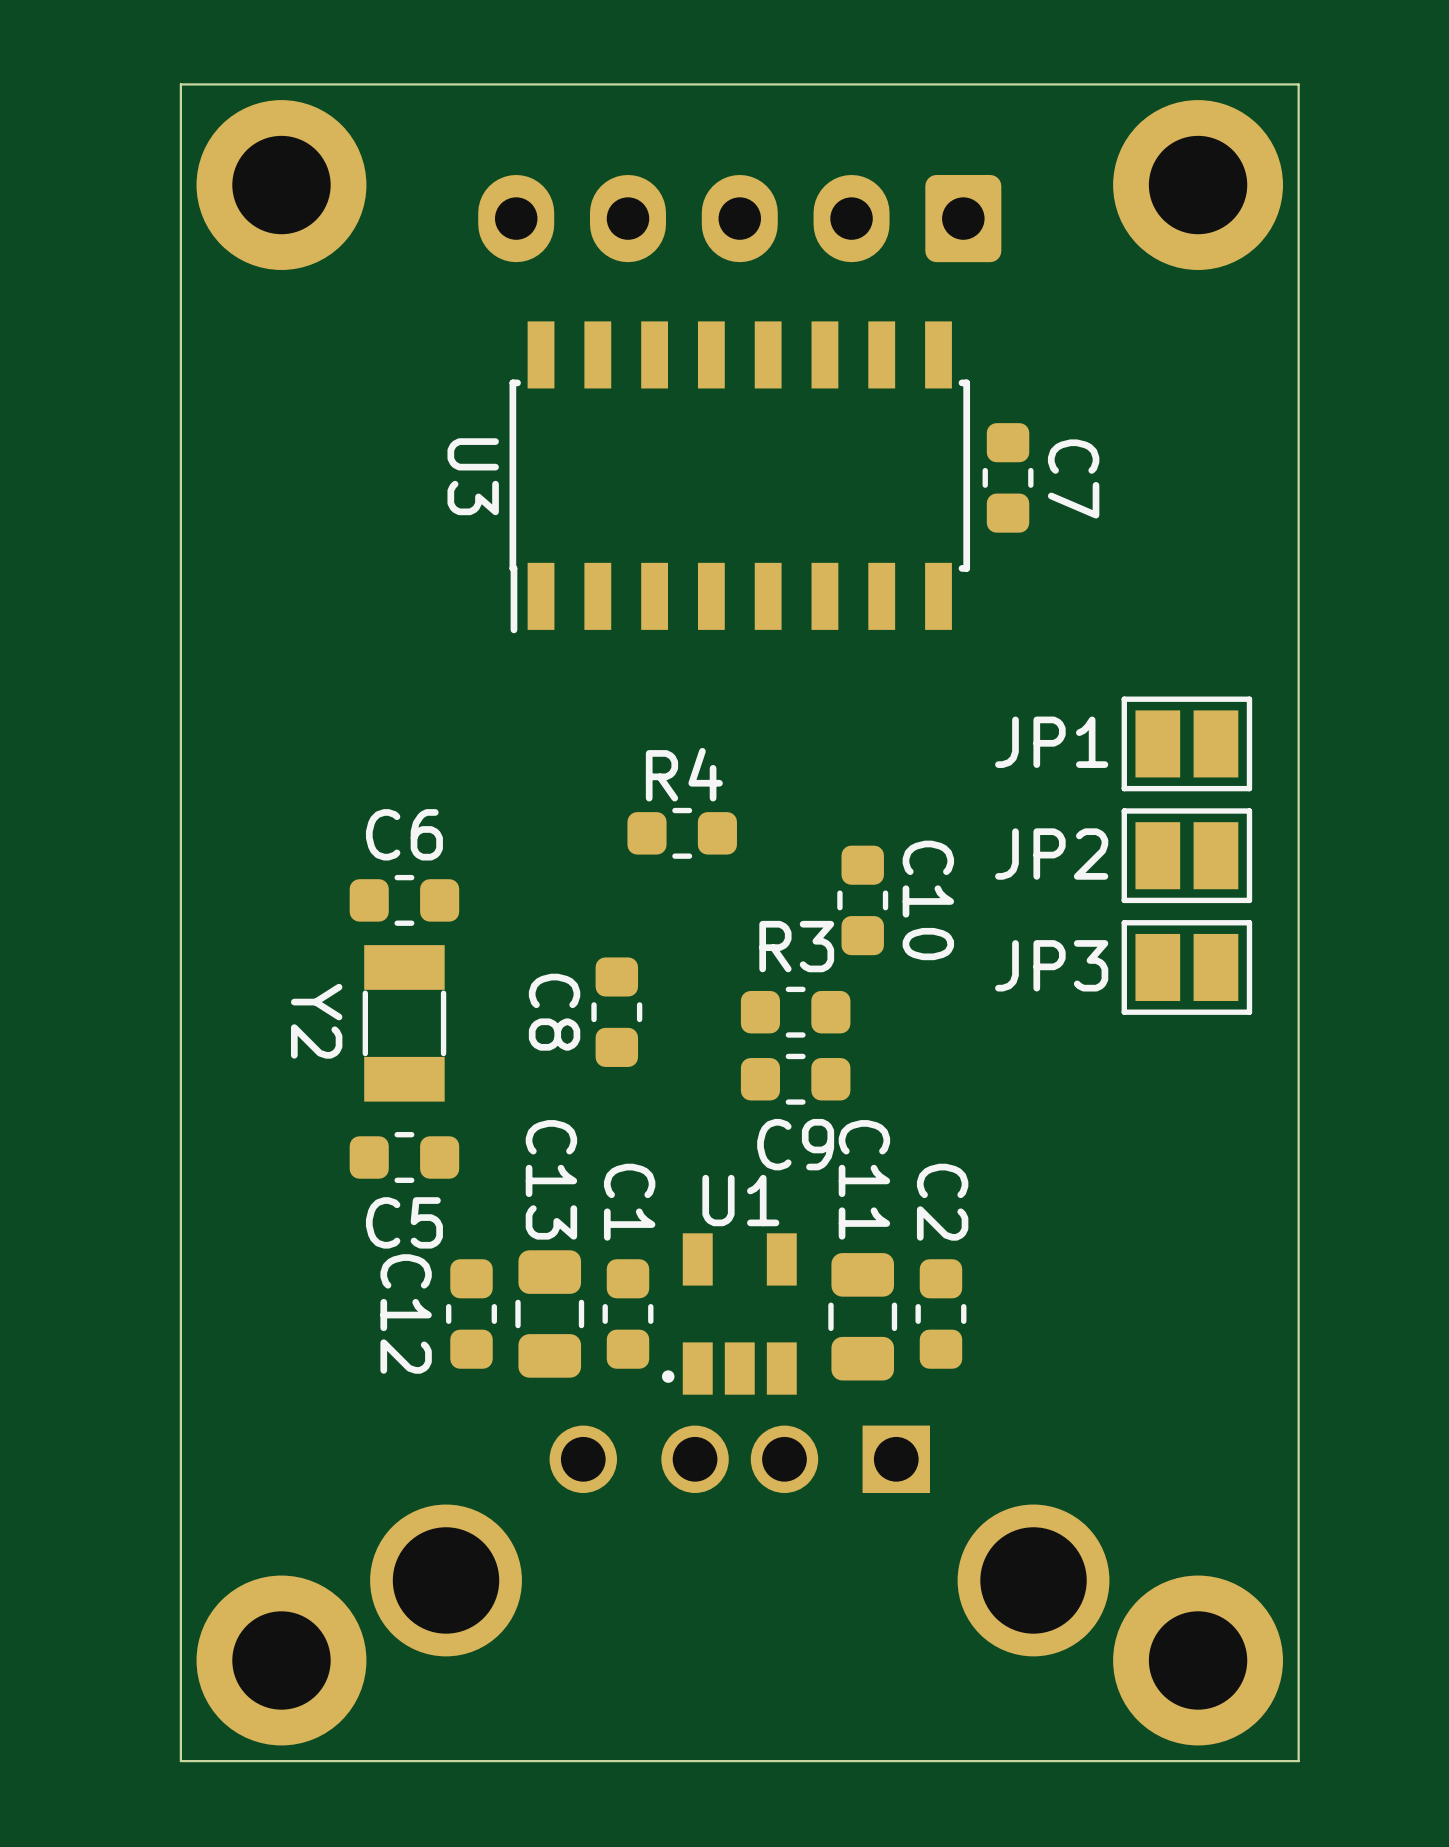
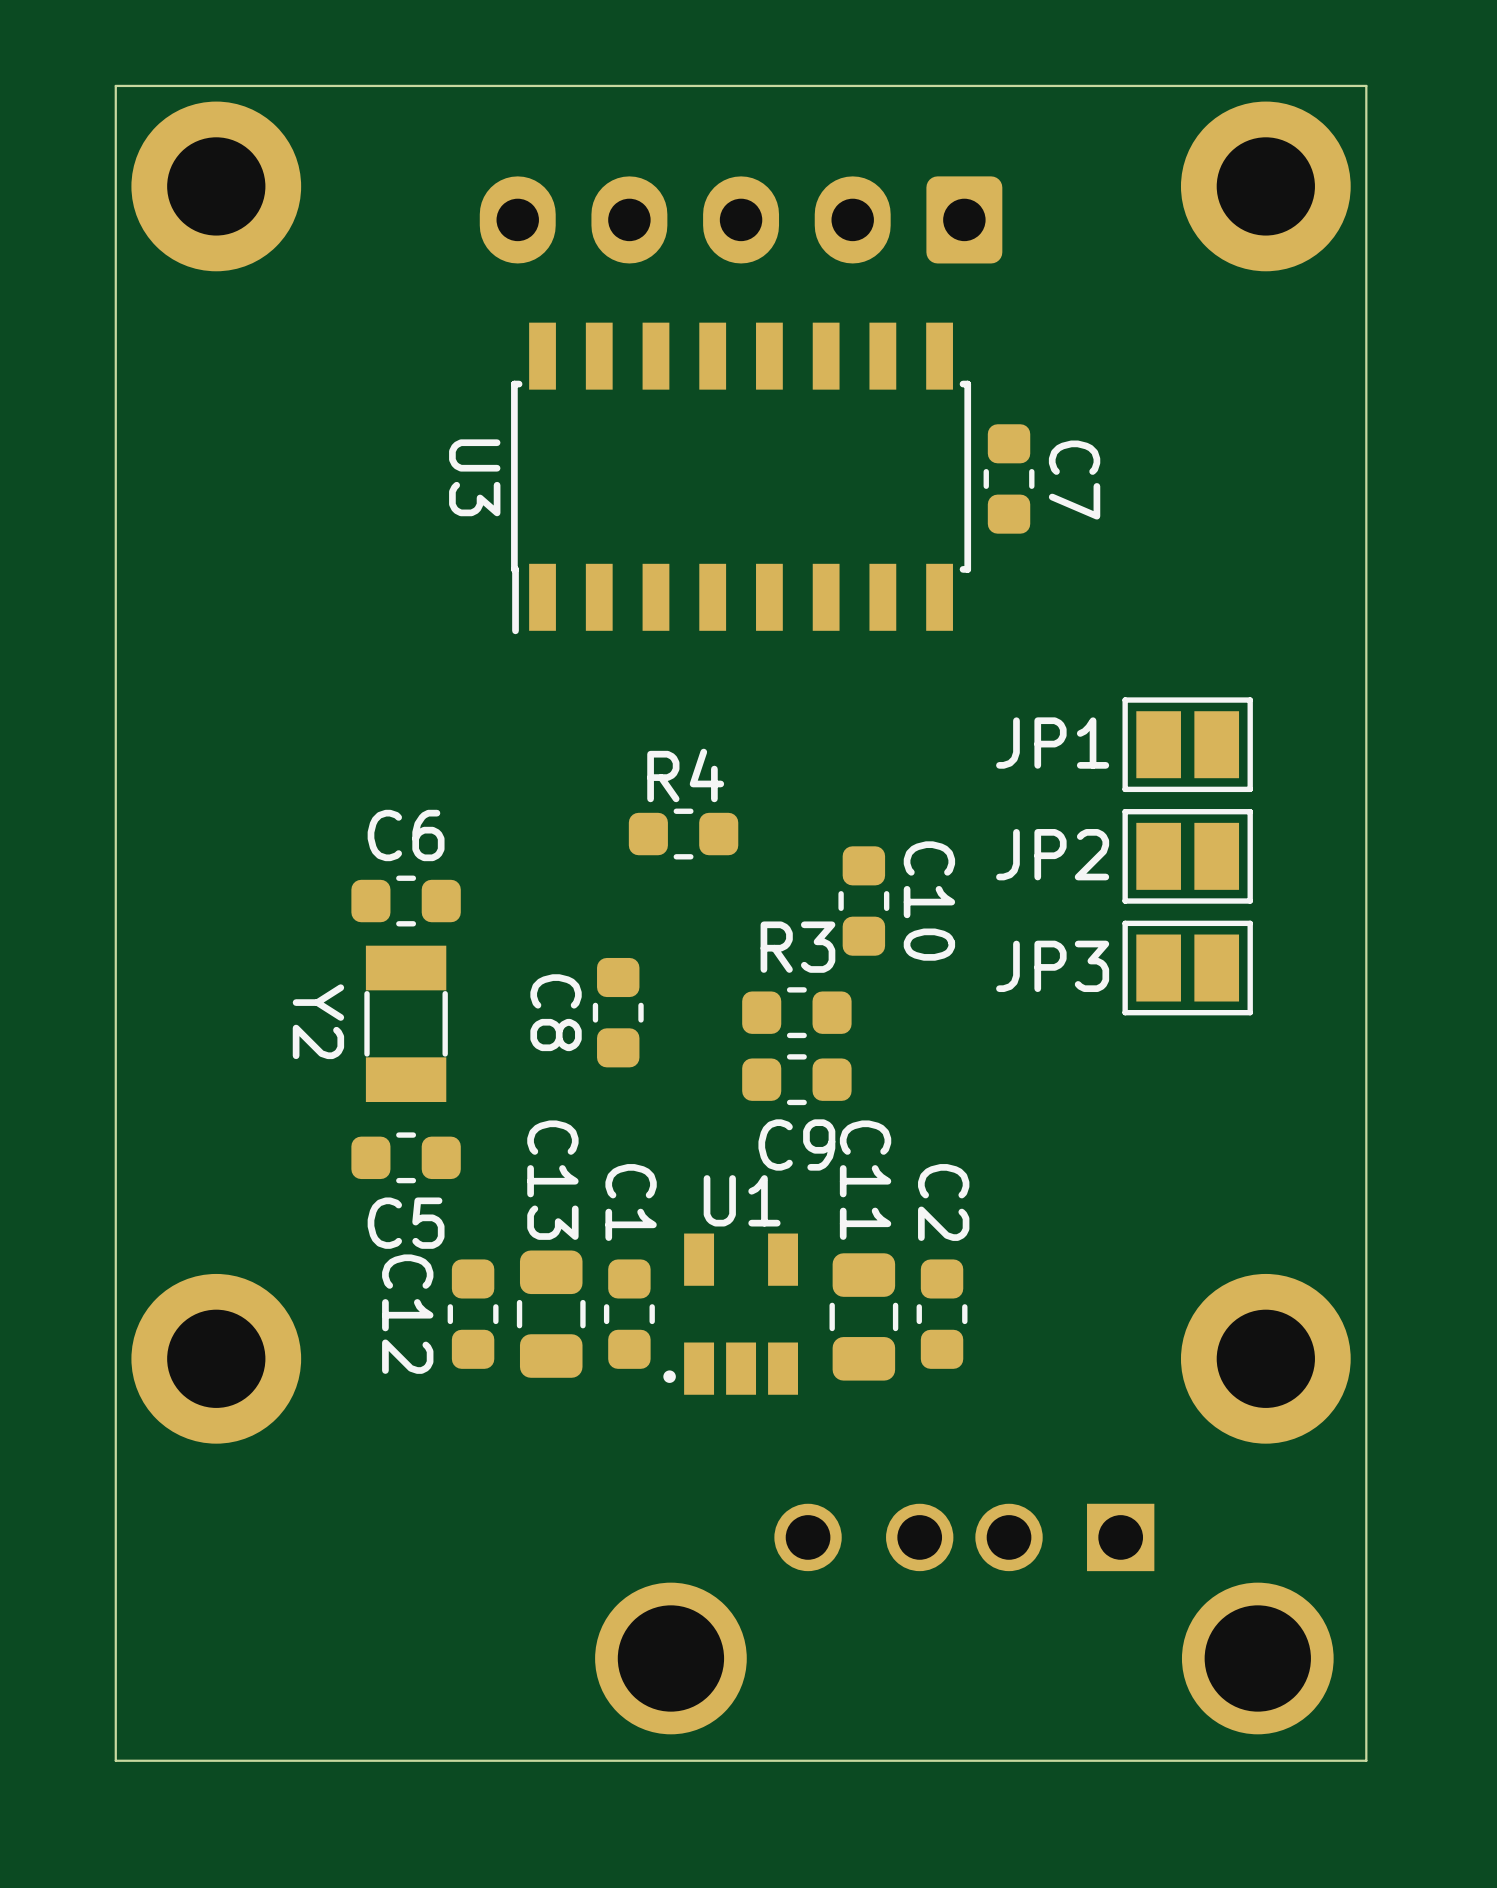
board edge: (180, 84) (180, 1761) -> (182, 85) (115, 85) (115, 1760) (182, 1760)
board edge: (1298, 84) (1298, 1761) -> (1299, 85) (1366, 85) (1366, 1760) (1299, 1760)
part position: (281, 185) -> (216, 186)
part position: (1198, 185) -> (1265, 186)
part position: (739, 1540) -> (964, 1619)
part position: (281, 1660) -> (216, 1358)
part position: (1198, 1660) -> (1265, 1358)

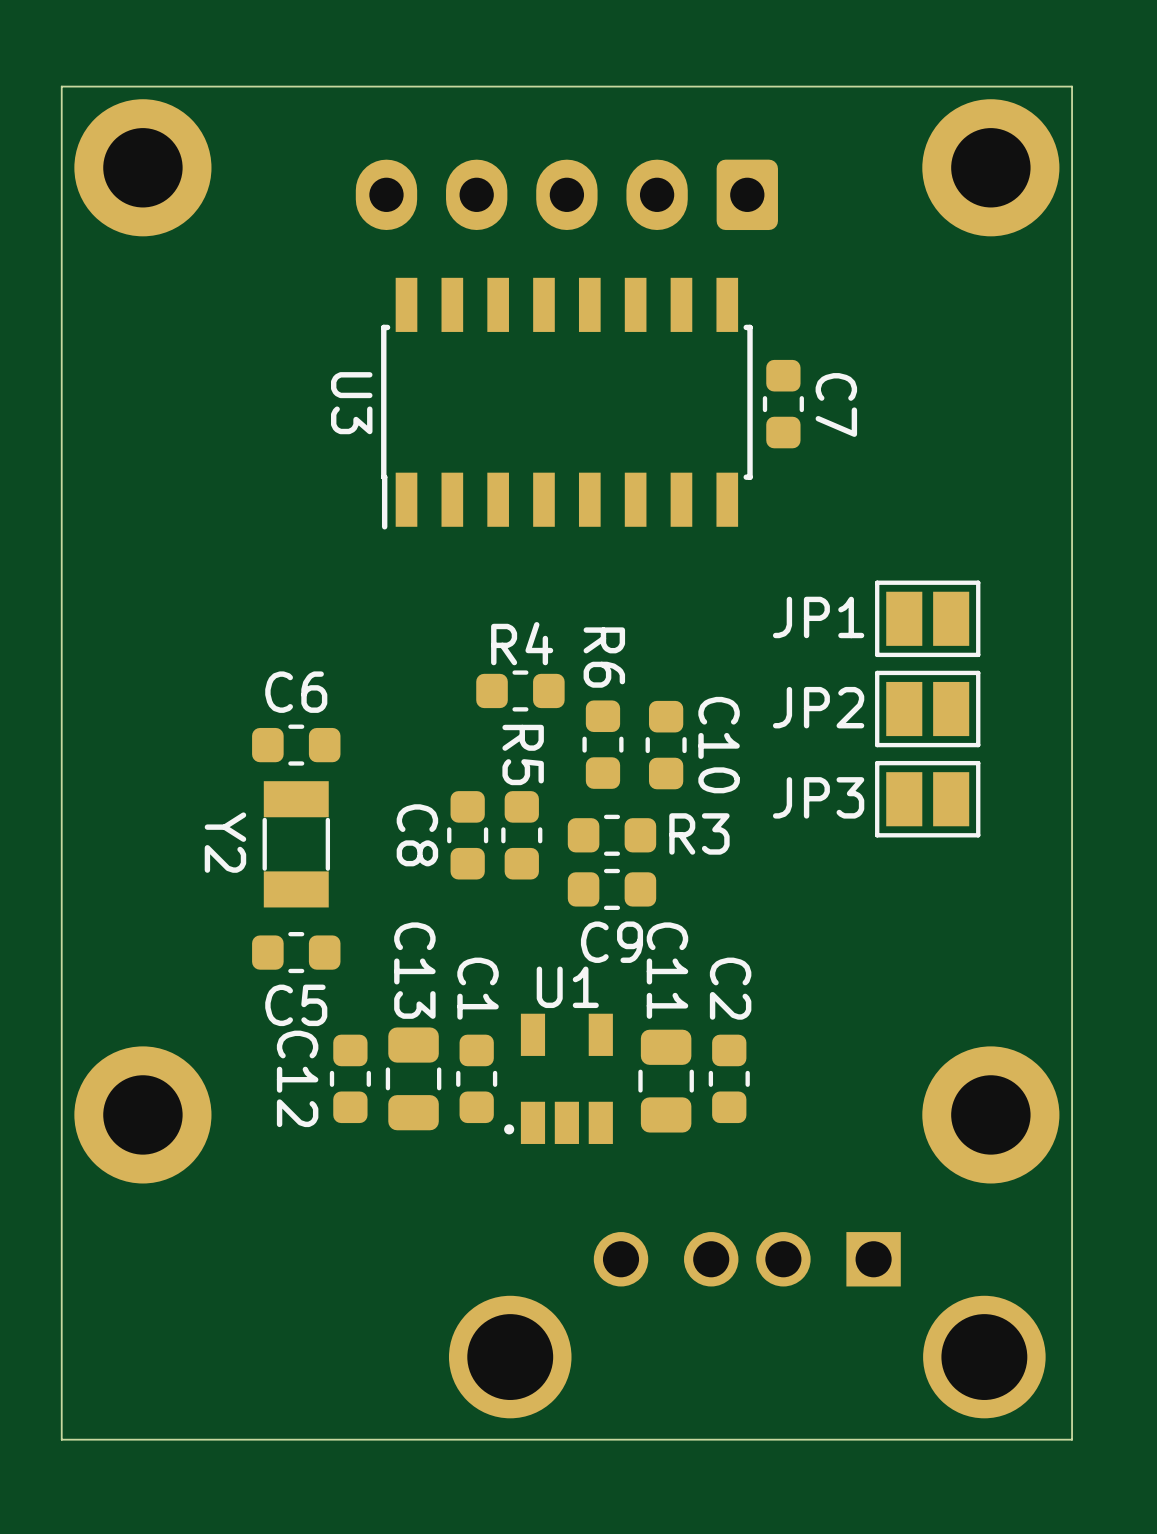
R6: none -> (602, 744)
R3 name position: R3 (797, 947) -> R3 (699, 833)
R5: none -> (521, 835)

